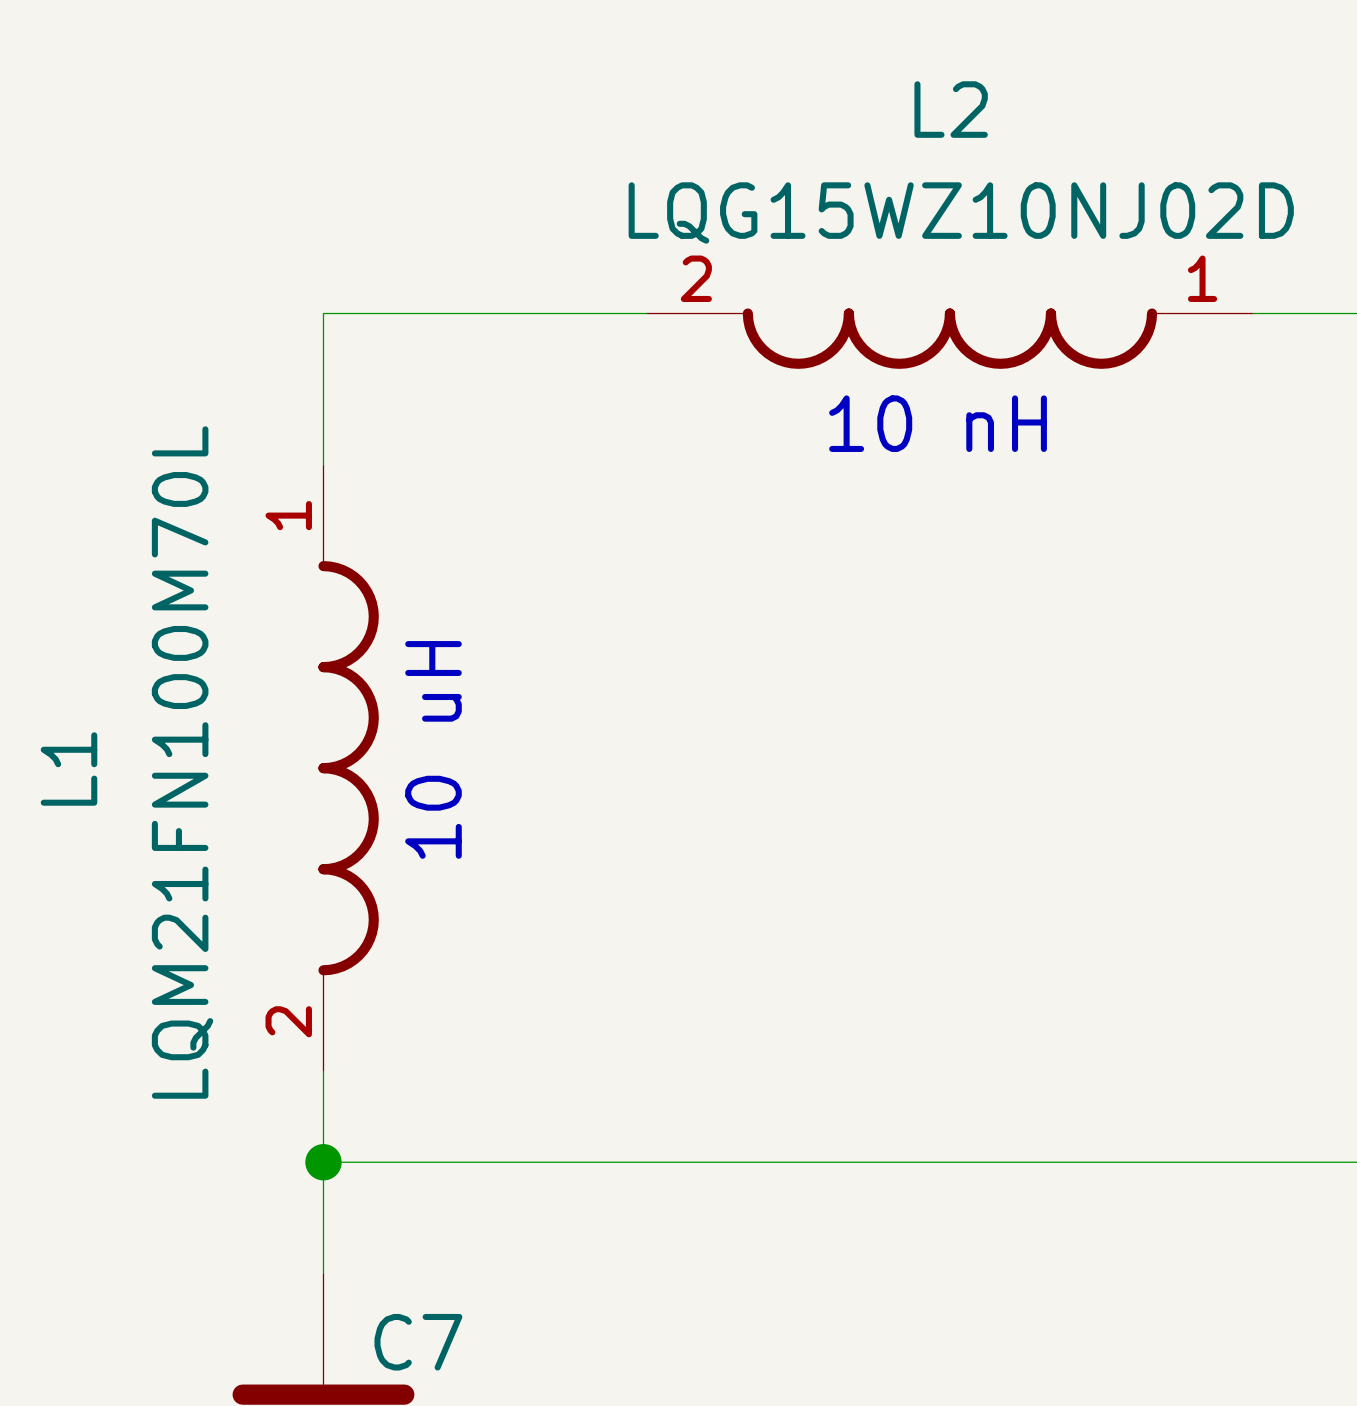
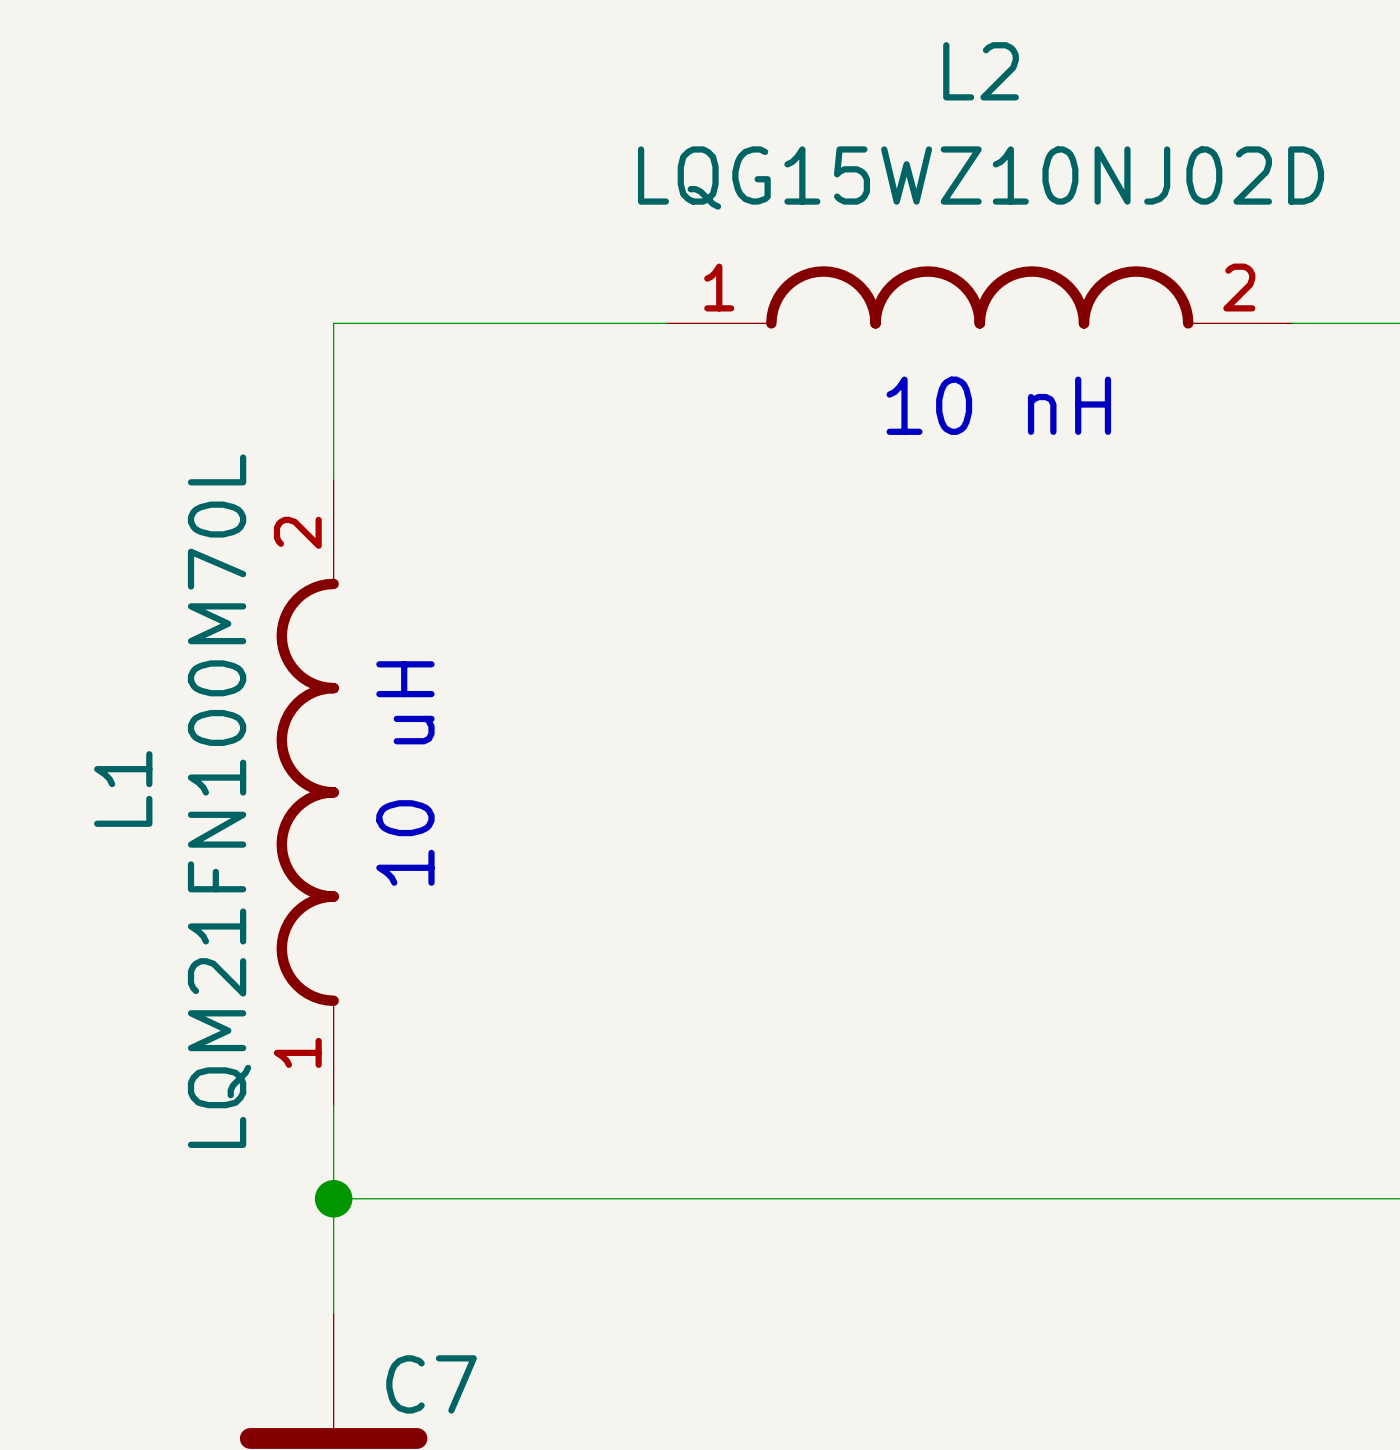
L2 rotation: 0° (949, 338) -> 180° (979, 297)
text position: 10 nH (938, 423) -> 10 nH (998, 405)
text position: 10 uH (433, 749) -> 10 uH (405, 773)
L1 value position: LQM21FN100M70L (182, 762) -> LQM21FN100M70L (219, 801)
L1 rotation: 0° (348, 768) -> 180° (307, 792)
L1 name position: L1 (68, 769) -> L1 (123, 789)

